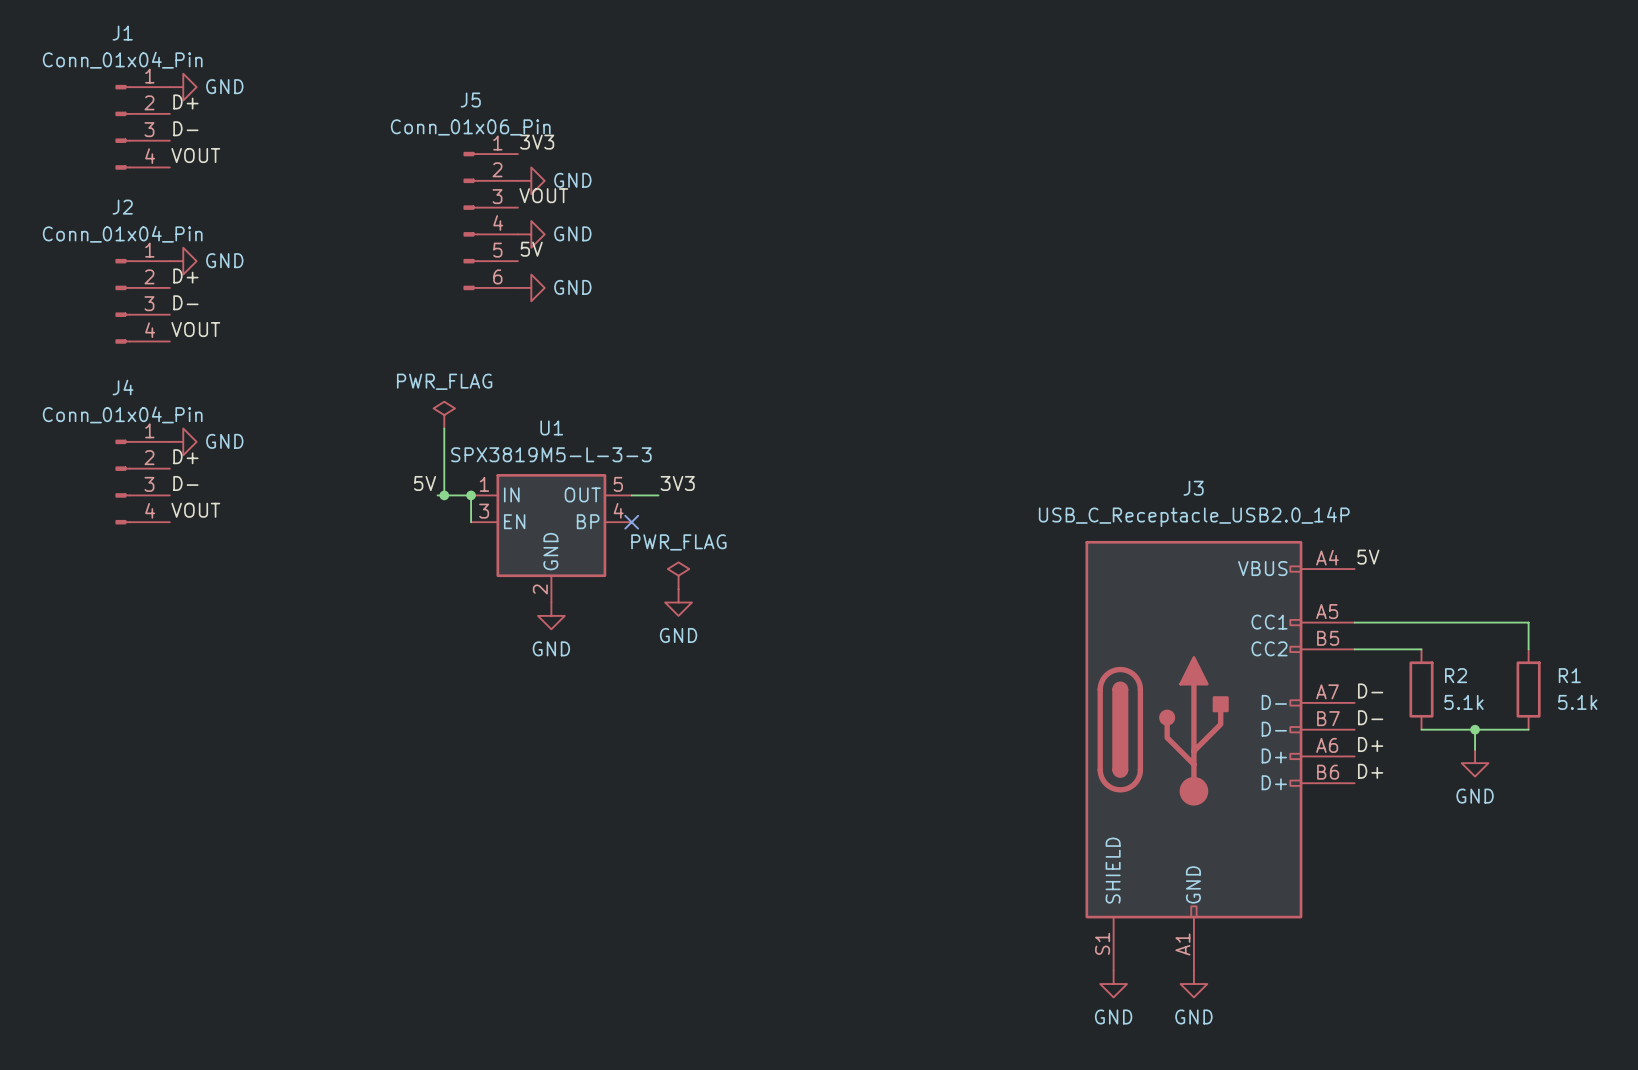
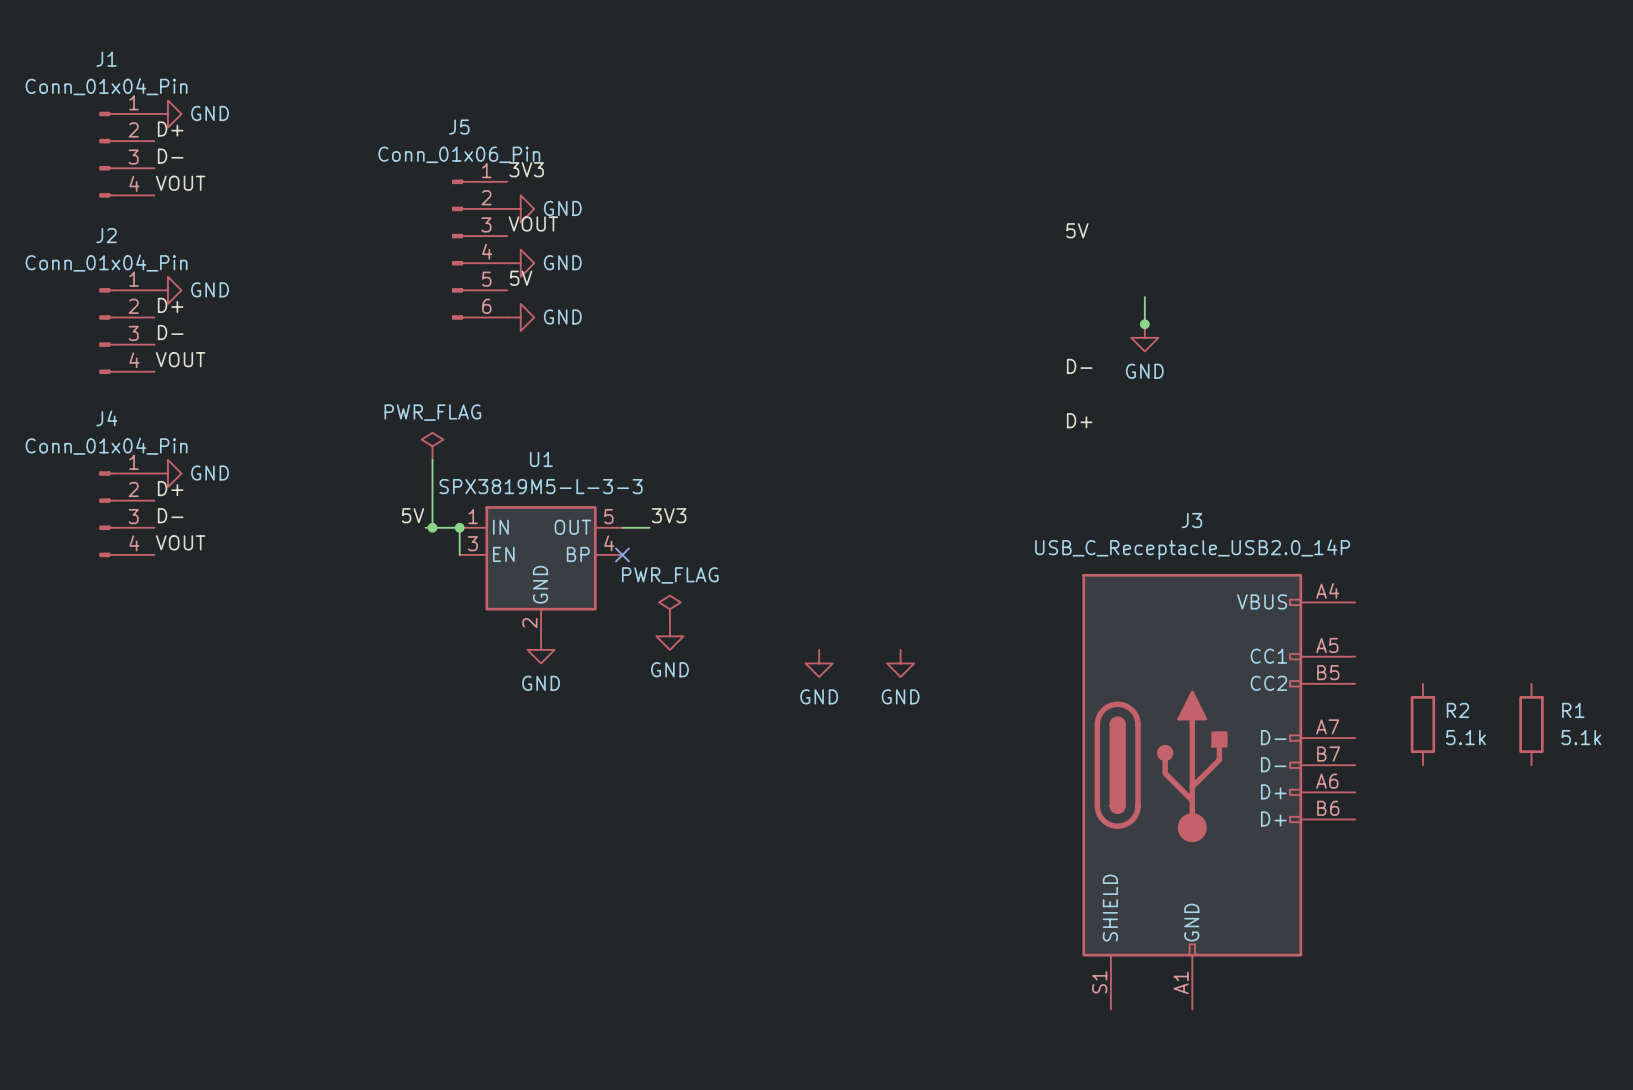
label: none -> 5V (1077, 230)
wire: none -> (1144, 297) (1144, 324)
junction: none -> (1144, 324)
power symbol: none -> GND (1144, 337)
label: none -> D- (1079, 366)
label: none -> D+ (1079, 420)
label: 5V (1368, 557) -> none
wire: (1354, 622) (1528, 622) (1528, 649) -> none
power symbol: none -> GND (819, 663)
power symbol: none -> GND (900, 663)
wire: (1354, 649) (1421, 649) -> none
label: D- (1370, 690) -> none
label: D- (1370, 717) -> none
wire: (1421, 729) (1528, 729) -> none
wire: (1475, 729) (1475, 749) -> none
junction: (1475, 729) -> none
label: D+ (1370, 744) -> none
power symbol: GND (1475, 763) -> none
label: D+ (1370, 771) -> none
power symbol: GND (1113, 984) -> none
power symbol: GND (1193, 984) -> none

